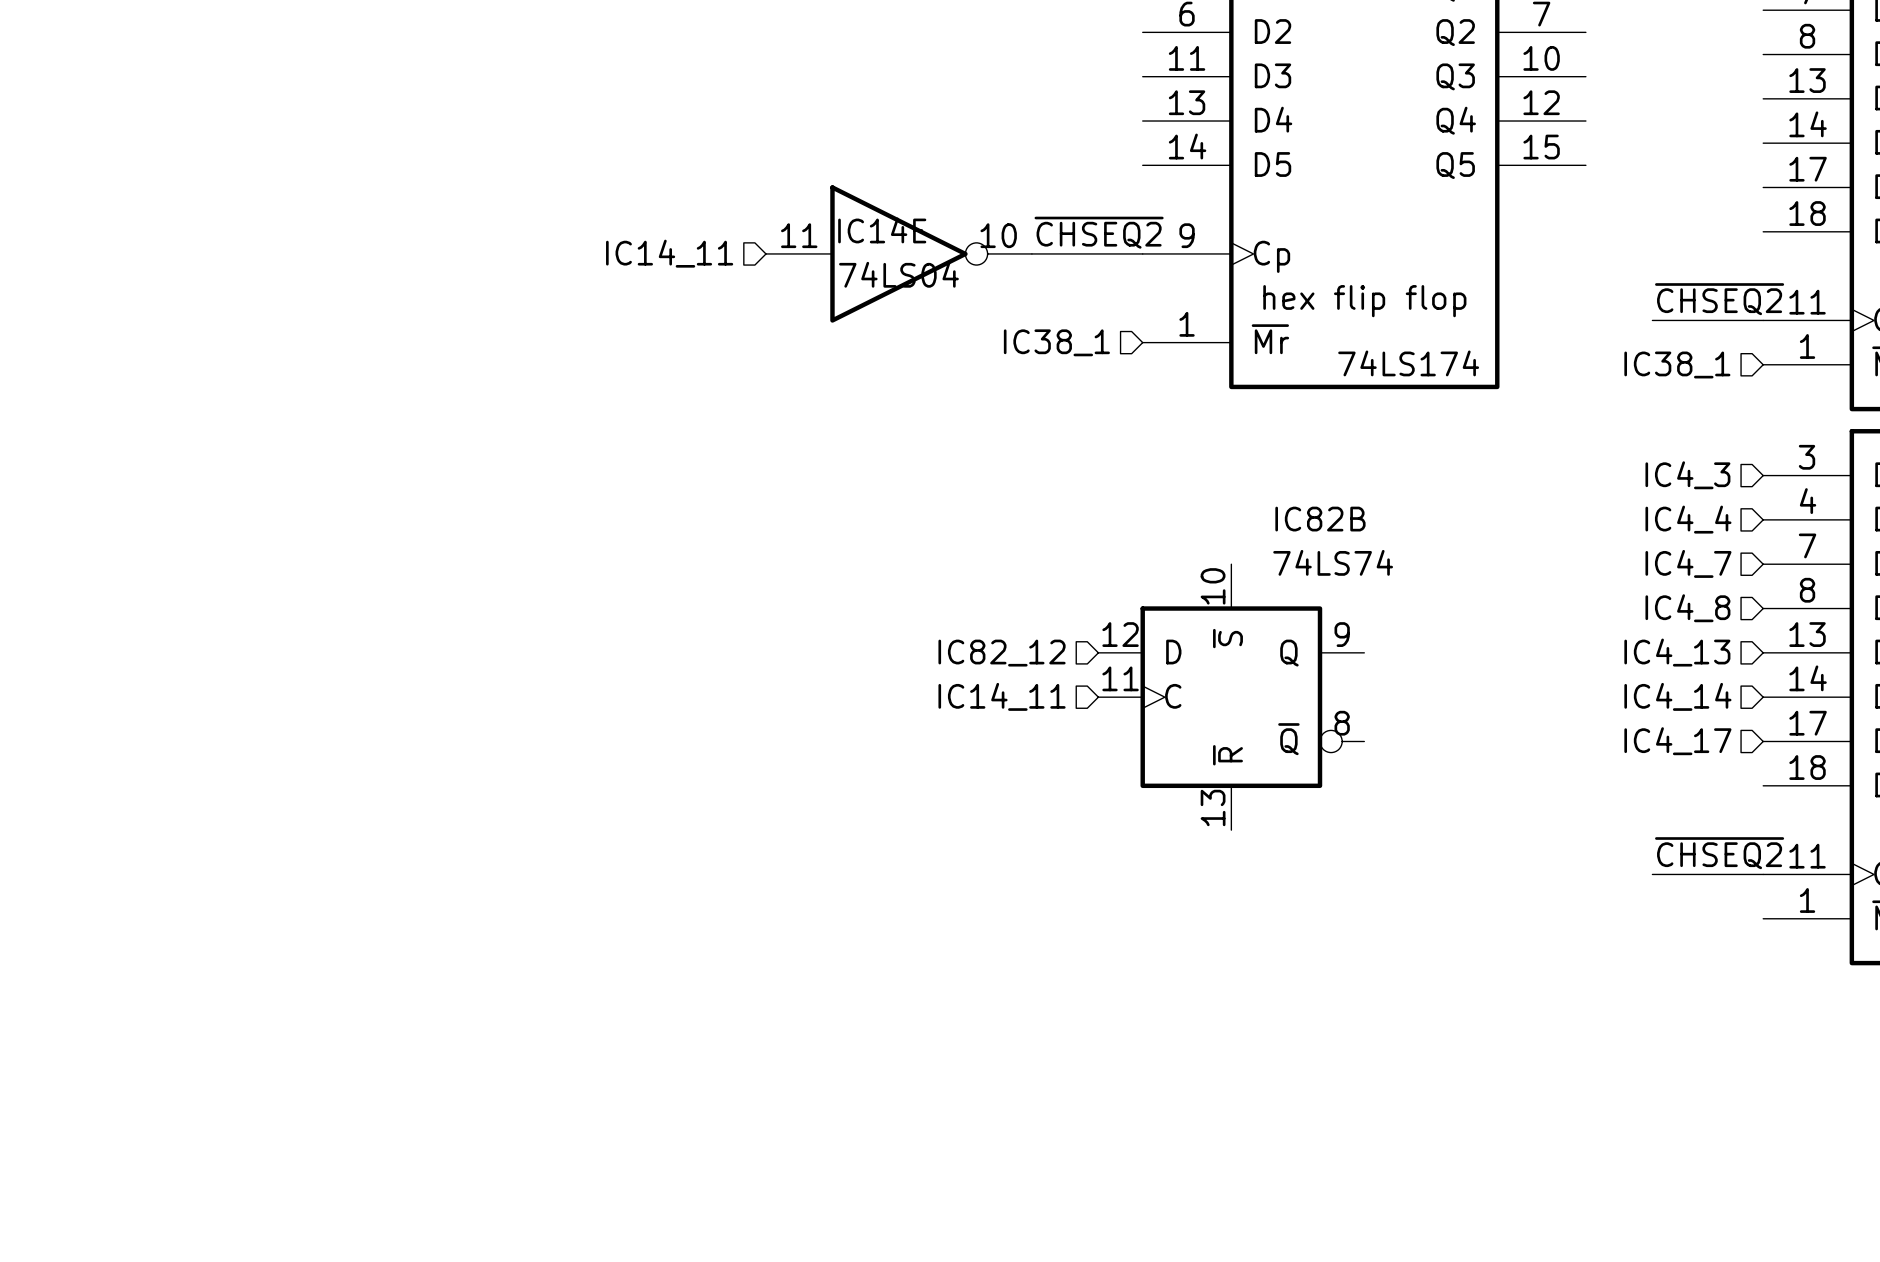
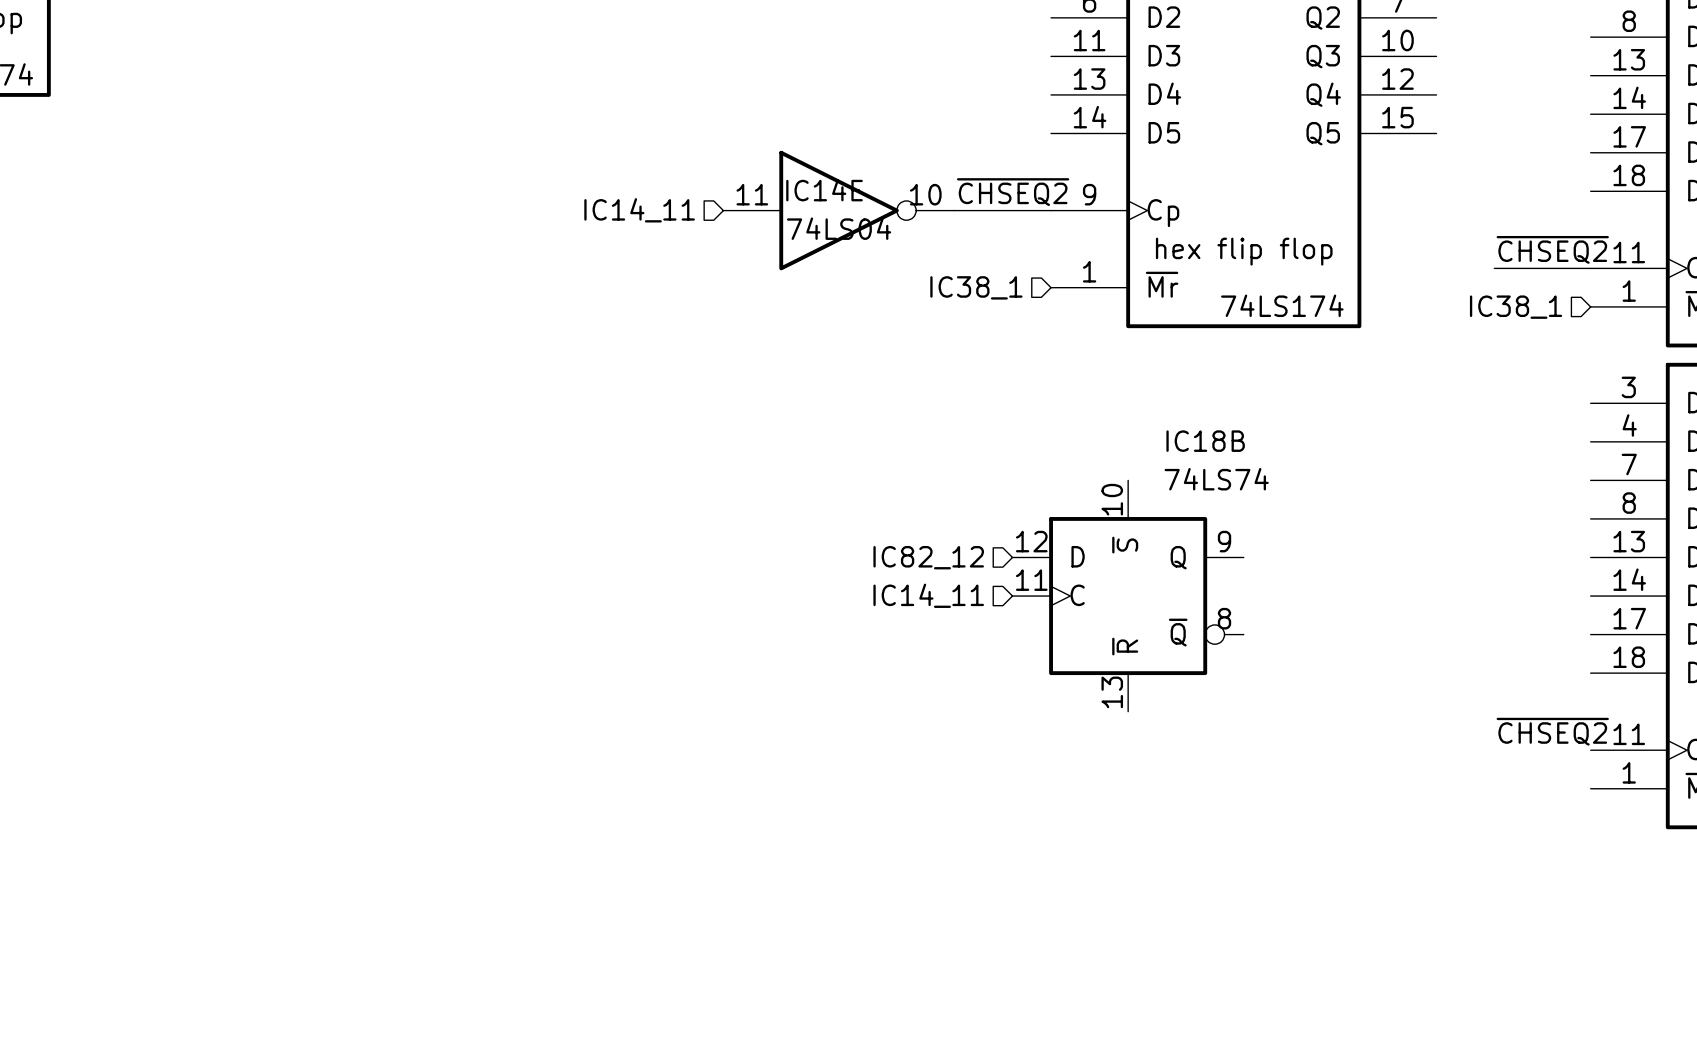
hierarchical label: IC4_3 (1687, 475) -> none
IC82B name: IC82B (1320, 519) -> IC18B (1205, 441)
hierarchical label: IC4_4 (1688, 519) -> none
hierarchical label: IC4_7 (1688, 563) -> none
hierarchical label: IC4_8 (1687, 608) -> none
hierarchical label: IC4_13 (1677, 652) -> none
hierarchical label: IC4_14 (1677, 696) -> none
hierarchical label: IC4_17 (1677, 741) -> none
wire: (1652, 874) (1763, 874) -> none

